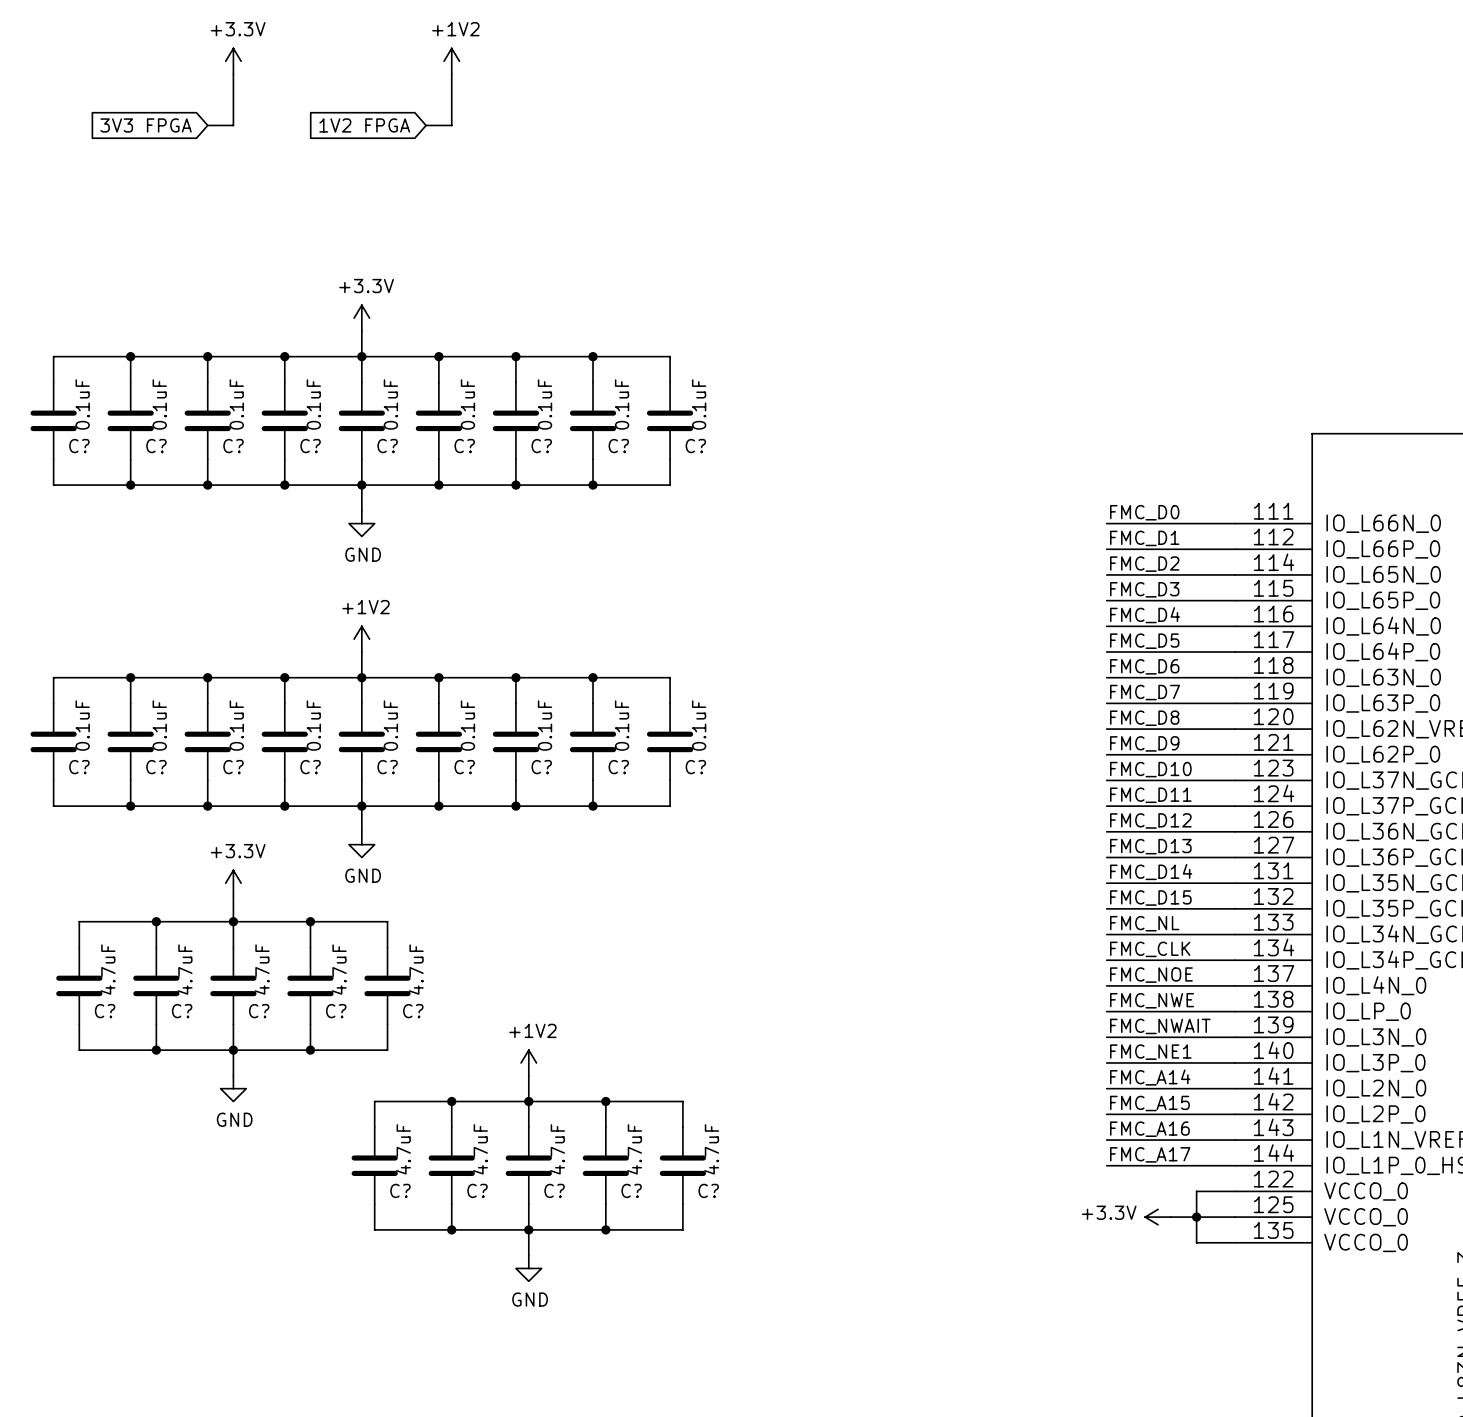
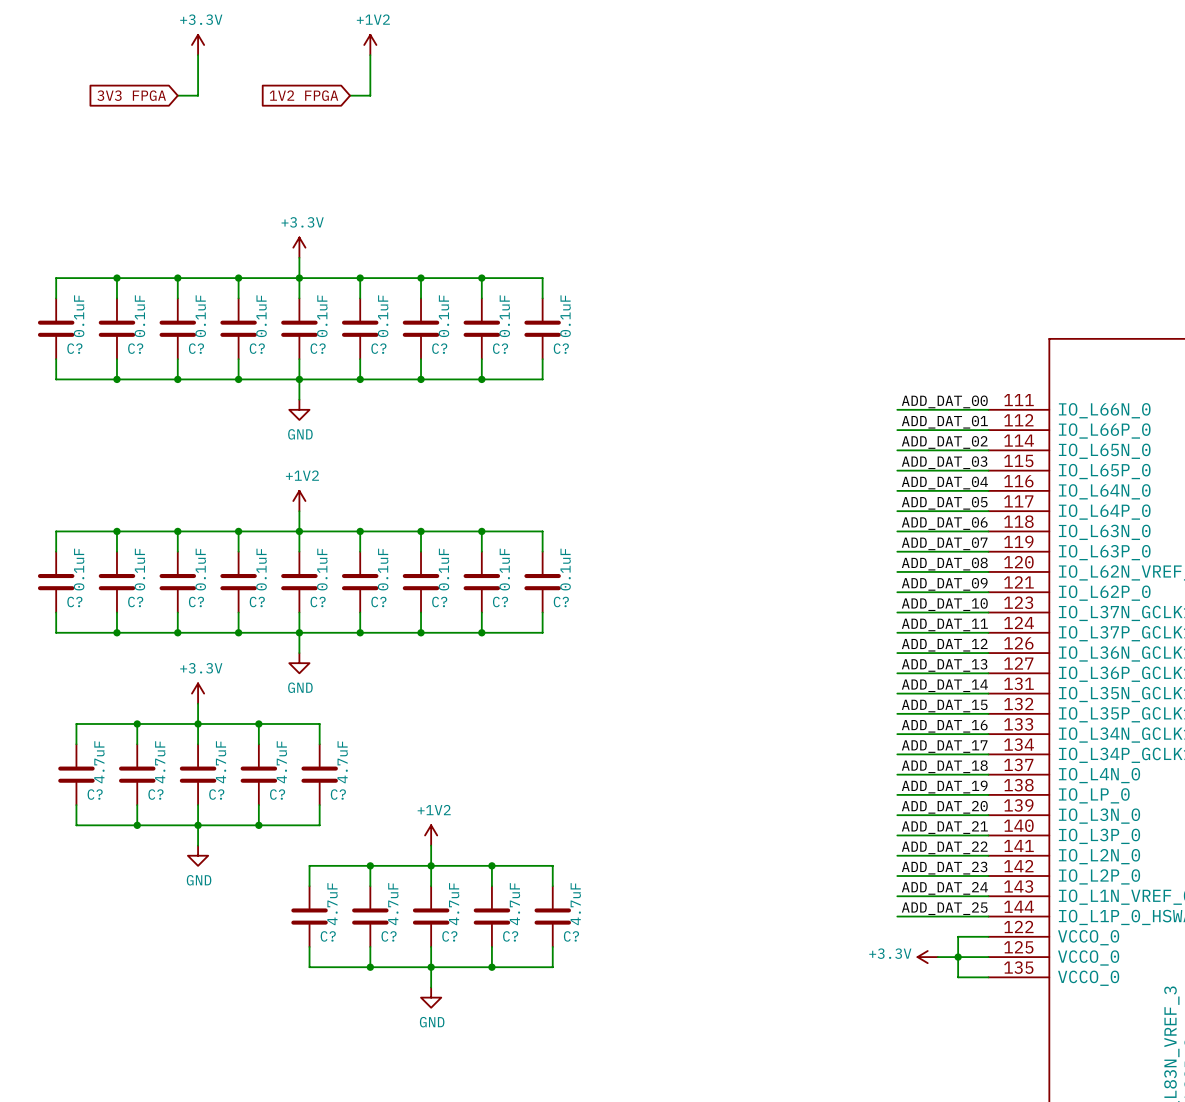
label: FMC_D0 (1144, 512) -> none
label: none -> ADD_DAT_00 (944, 401)
wire: (1106, 523) (1119, 523) -> none
label: FMC_D1 (1144, 538) -> none
label: none -> ADD_DAT_01 (944, 422)
wire: (1106, 549) (1119, 549) -> none
label: FMC_D2 (1144, 564) -> none
label: none -> ADD_DAT_02 (944, 442)
wire: (1106, 574) (1119, 574) -> none
label: FMC_D3 (1144, 589) -> none
label: none -> ADD_DAT_03 (944, 462)
wire: (1106, 600) (1119, 600) -> none
label: FMC_D4 (1145, 615) -> none
label: none -> ADD_DAT_04 (944, 483)
wire: (1106, 626) (1119, 626) -> none
label: FMC_D5 (1144, 641) -> none
label: none -> ADD_DAT_05 (944, 503)
wire: (1106, 652) (1119, 652) -> none
label: FMC_D6 (1144, 666) -> none
label: none -> ADD_DAT_06 (944, 523)
wire: (1106, 677) (1119, 677) -> none
label: FMC_D7 (1145, 692) -> none
label: none -> ADD_DAT_07 (944, 543)
wire: (1106, 703) (1119, 703) -> none
label: FMC_D8 (1144, 718) -> none
label: none -> ADD_DAT_08 (944, 564)
wire: (1106, 729) (1119, 729) -> none
label: FMC_D9 (1144, 743) -> none
label: none -> ADD_DAT_09 (944, 584)
wire: (1106, 754) (1119, 754) -> none
label: FMC_D10 (1150, 769) -> none
label: none -> ADD_DAT_10 (944, 604)
wire: (1106, 780) (1119, 780) -> none
label: FMC_D11 (1150, 795) -> none
label: none -> ADD_DAT_11 (944, 624)
wire: (1106, 806) (1119, 806) -> none
label: FMC_D12 (1150, 820) -> none
label: none -> ADD_DAT_12 (944, 645)
wire: (1106, 831) (1119, 831) -> none
label: FMC_D13 (1150, 846) -> none
label: none -> ADD_DAT_13 (944, 665)
wire: (1106, 857) (1119, 857) -> none
label: FMC_D14 (1151, 872) -> none
label: none -> ADD_DAT_14 (944, 685)
wire: (1106, 883) (1119, 883) -> none
label: FMC_D15 (1150, 898) -> none
label: none -> ADD_DAT_15 (944, 706)
wire: (1106, 908) (1119, 908) -> none
label: FMC_NL (1144, 923) -> none
label: none -> ADD_DAT_16 (944, 726)
wire: (1106, 934) (1119, 934) -> none
label: FMC_CLK (1150, 949) -> none
label: none -> ADD_DAT_17 (944, 746)
wire: (1106, 960) (1119, 960) -> none
label: FMC_NOE (1151, 975) -> none
label: none -> ADD_DAT_18 (944, 766)
wire: (1106, 985) (1119, 985) -> none
label: FMC_NWE (1152, 1000) -> none
label: none -> ADD_DAT_19 (944, 787)
wire: (1106, 1011) (1119, 1011) -> none
label: FMC_NWAIT (1160, 1026) -> none
label: none -> ADD_DAT_20 (944, 807)
wire: (1106, 1037) (1119, 1037) -> none
label: FMC_NE1 (1150, 1052) -> none
label: none -> ADD_DAT_21 (944, 827)
wire: (1106, 1062) (1119, 1062) -> none
label: FMC_A14 (1150, 1077) -> none
label: none -> ADD_DAT_22 (944, 847)
wire: (1106, 1088) (1119, 1088) -> none
label: FMC_A15 (1149, 1103) -> none
label: none -> ADD_DAT_23 (944, 868)
wire: (1106, 1114) (1119, 1114) -> none
label: none -> ADD_DAT_24 (944, 888)
label: FMC_A16 (1149, 1129) -> none
wire: (1106, 1140) (1119, 1140) -> none
label: FMC_A17 (1150, 1154) -> none
label: none -> ADD_DAT_25 (944, 908)
wire: (1106, 1165) (1119, 1165) -> none

